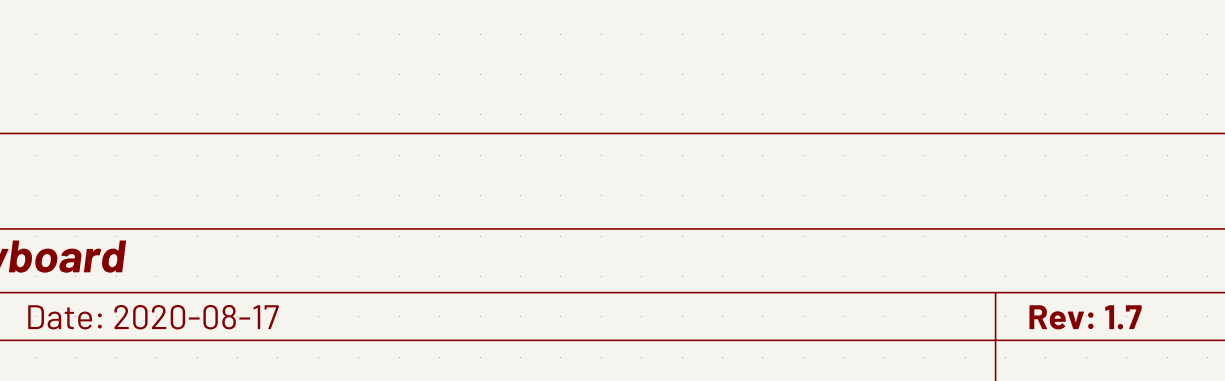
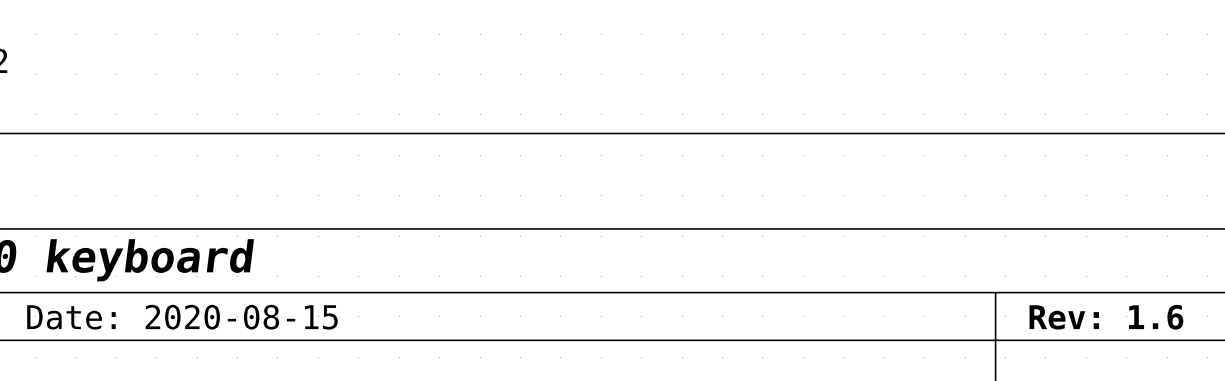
title block: Date: 2020-08-17 (153, 317) -> Date: 2020-08-15 (182, 317)
title block: Rev: 1.7 (1085, 317) -> Rev: 1.6 (1106, 317)

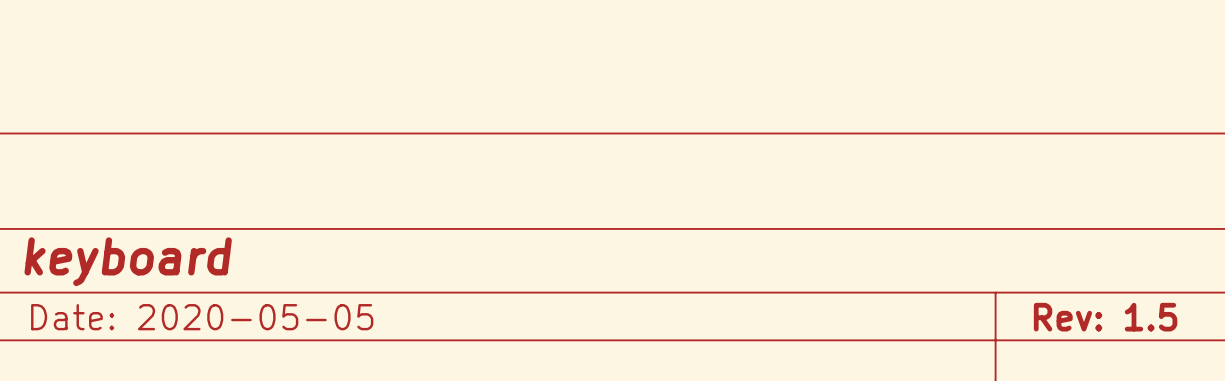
title block: Date: 2020-08-15 (182, 317) -> Date: 2020-05-05 (202, 317)
title block: Rev: 1.6 (1106, 317) -> Rev: 1.5 (1105, 317)

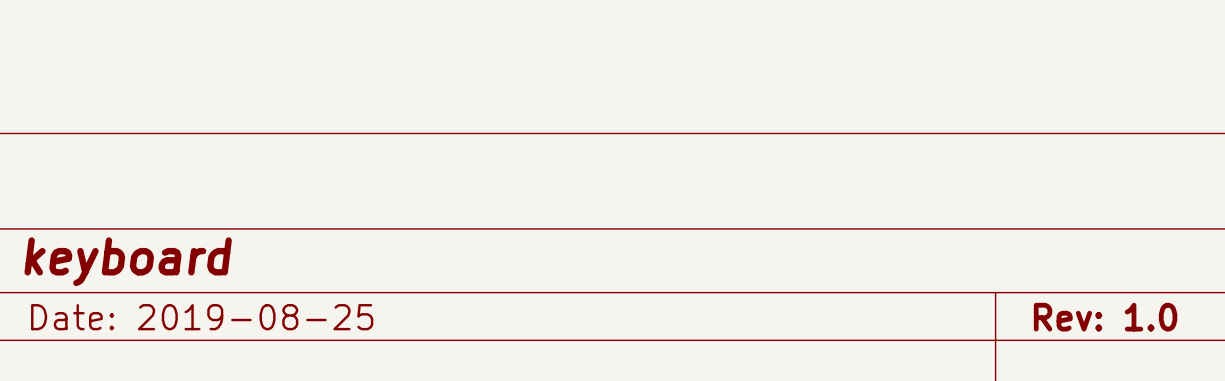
title block: Date: 2020-05-05 (202, 317) -> Date: 2019-08-25 (202, 317)
title block: Rev: 1.5 (1105, 317) -> Rev: 1.0 (1105, 317)

